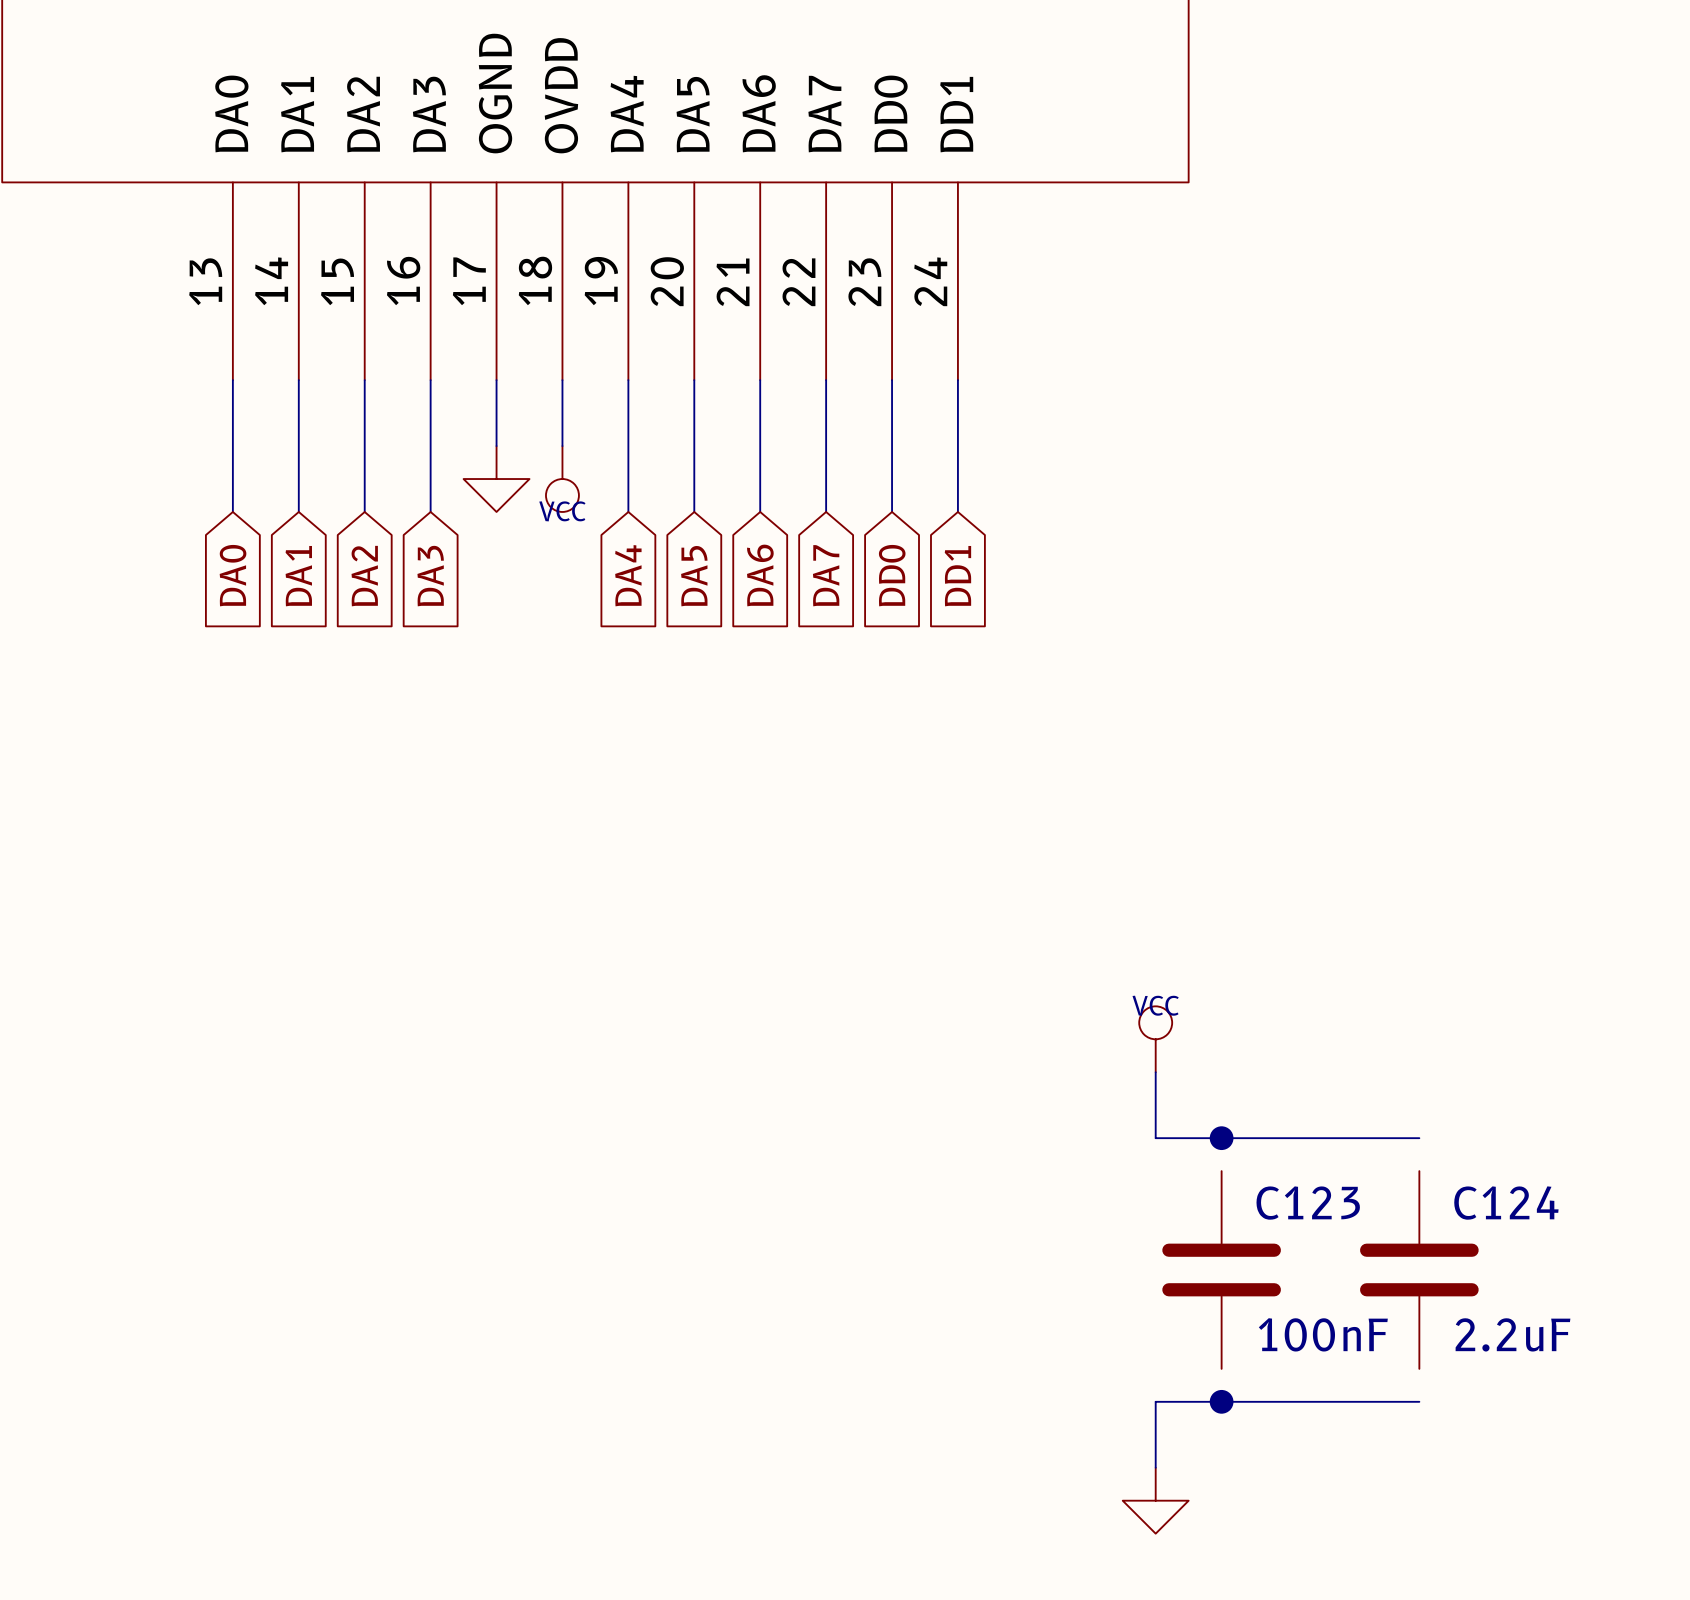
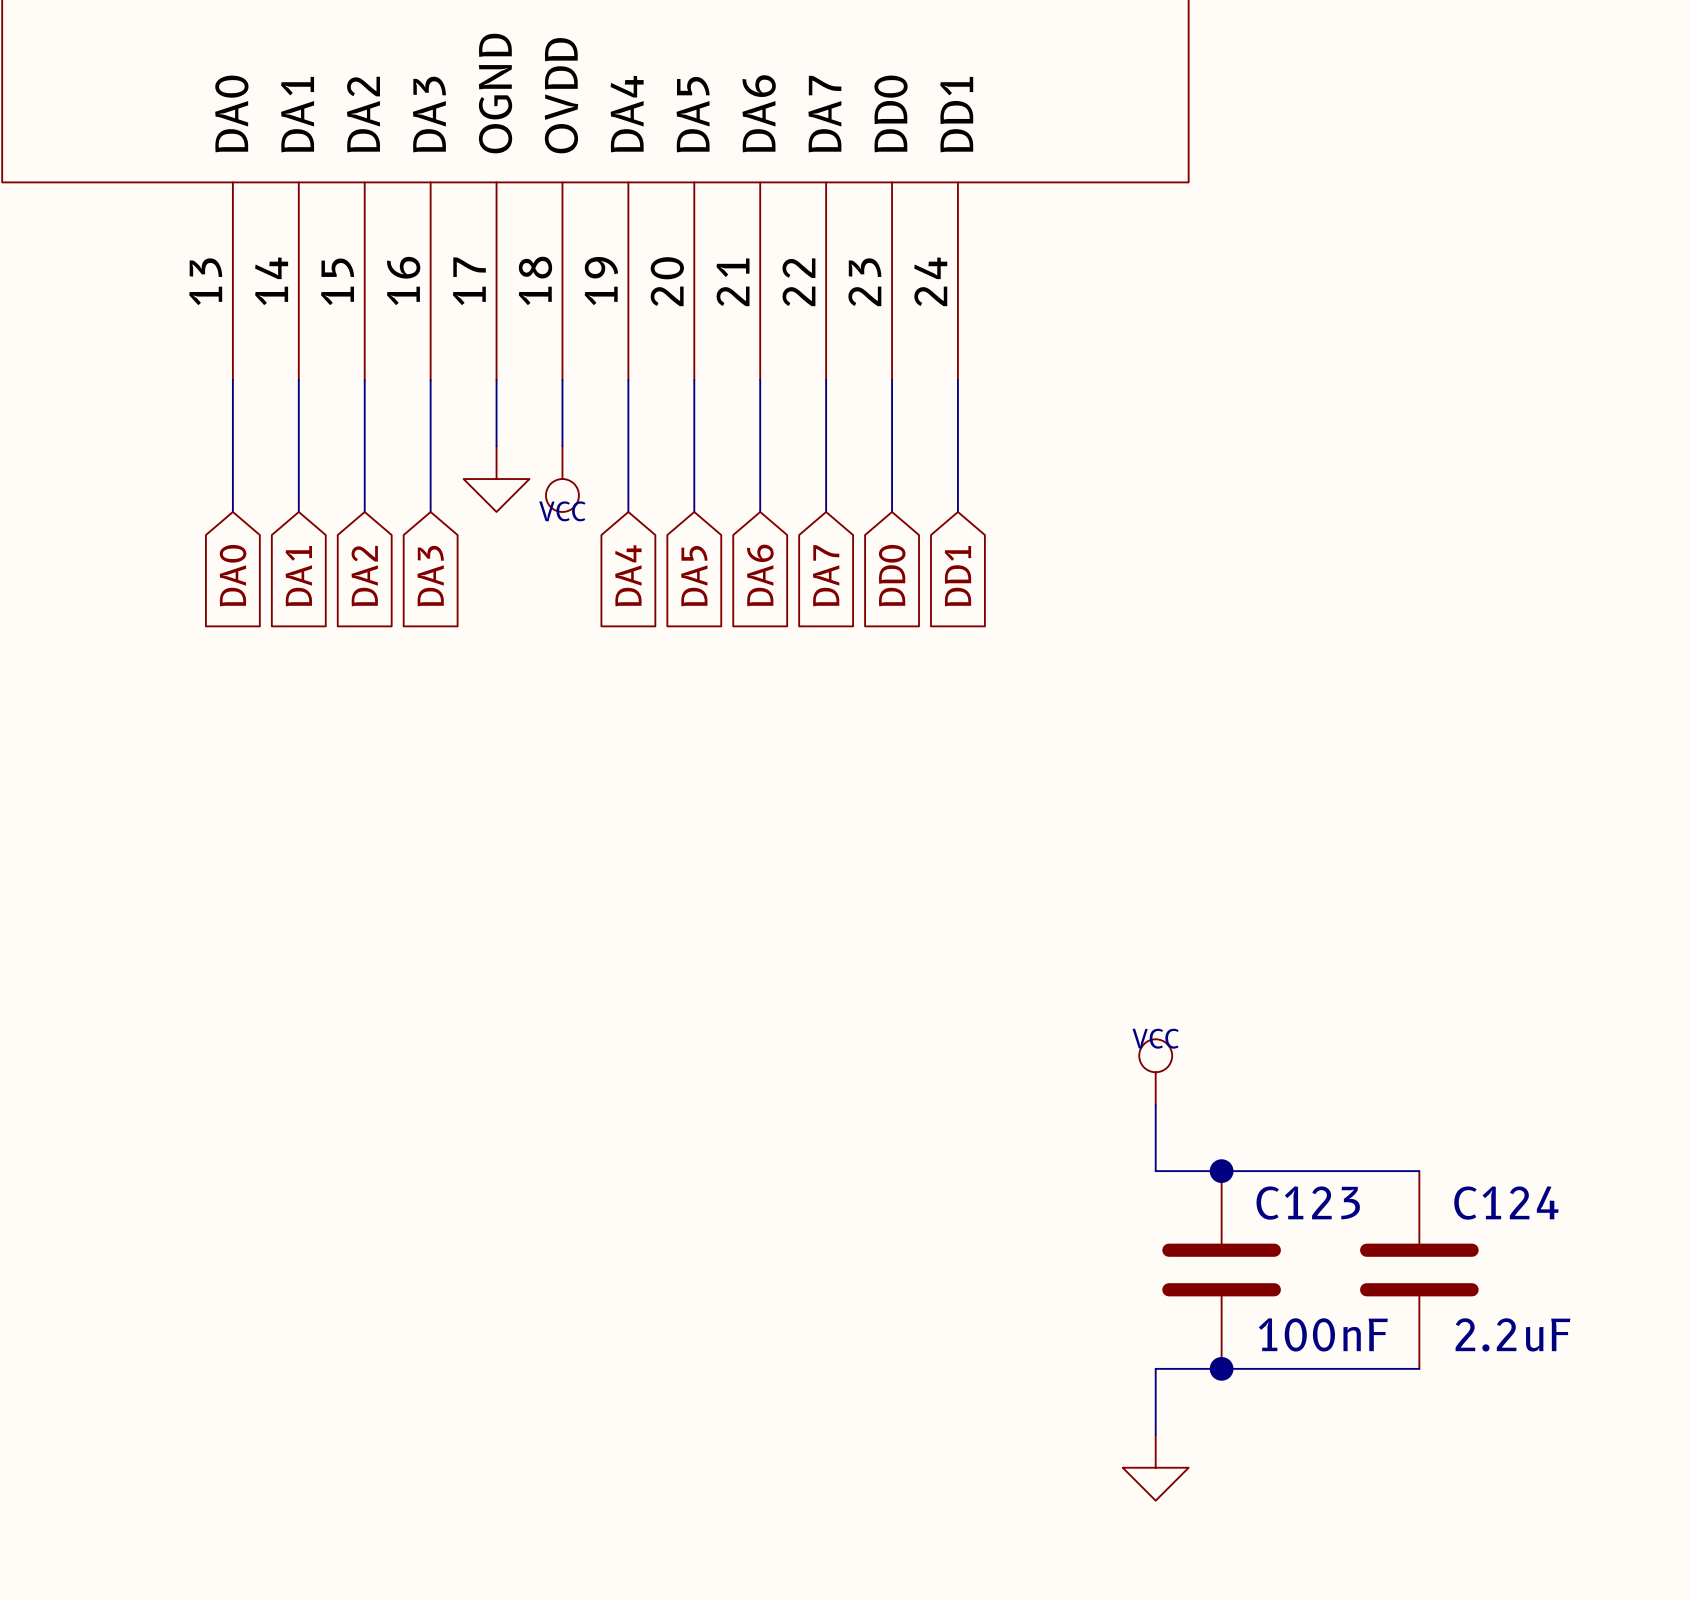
power symbol position: VCC (1155, 1039) -> VCC (1155, 1072)
wire: (1155, 1138) (1419, 1138) -> (1155, 1138) (1155, 1171) (1419, 1171)
junction position: (1221, 1138) -> (1221, 1171)
wire: (1155, 1401) (1419, 1401) -> (1155, 1401) (1155, 1368) (1419, 1368)
junction position: (1221, 1401) -> (1221, 1368)
power symbol position: (1155, 1500) -> (1155, 1467)

